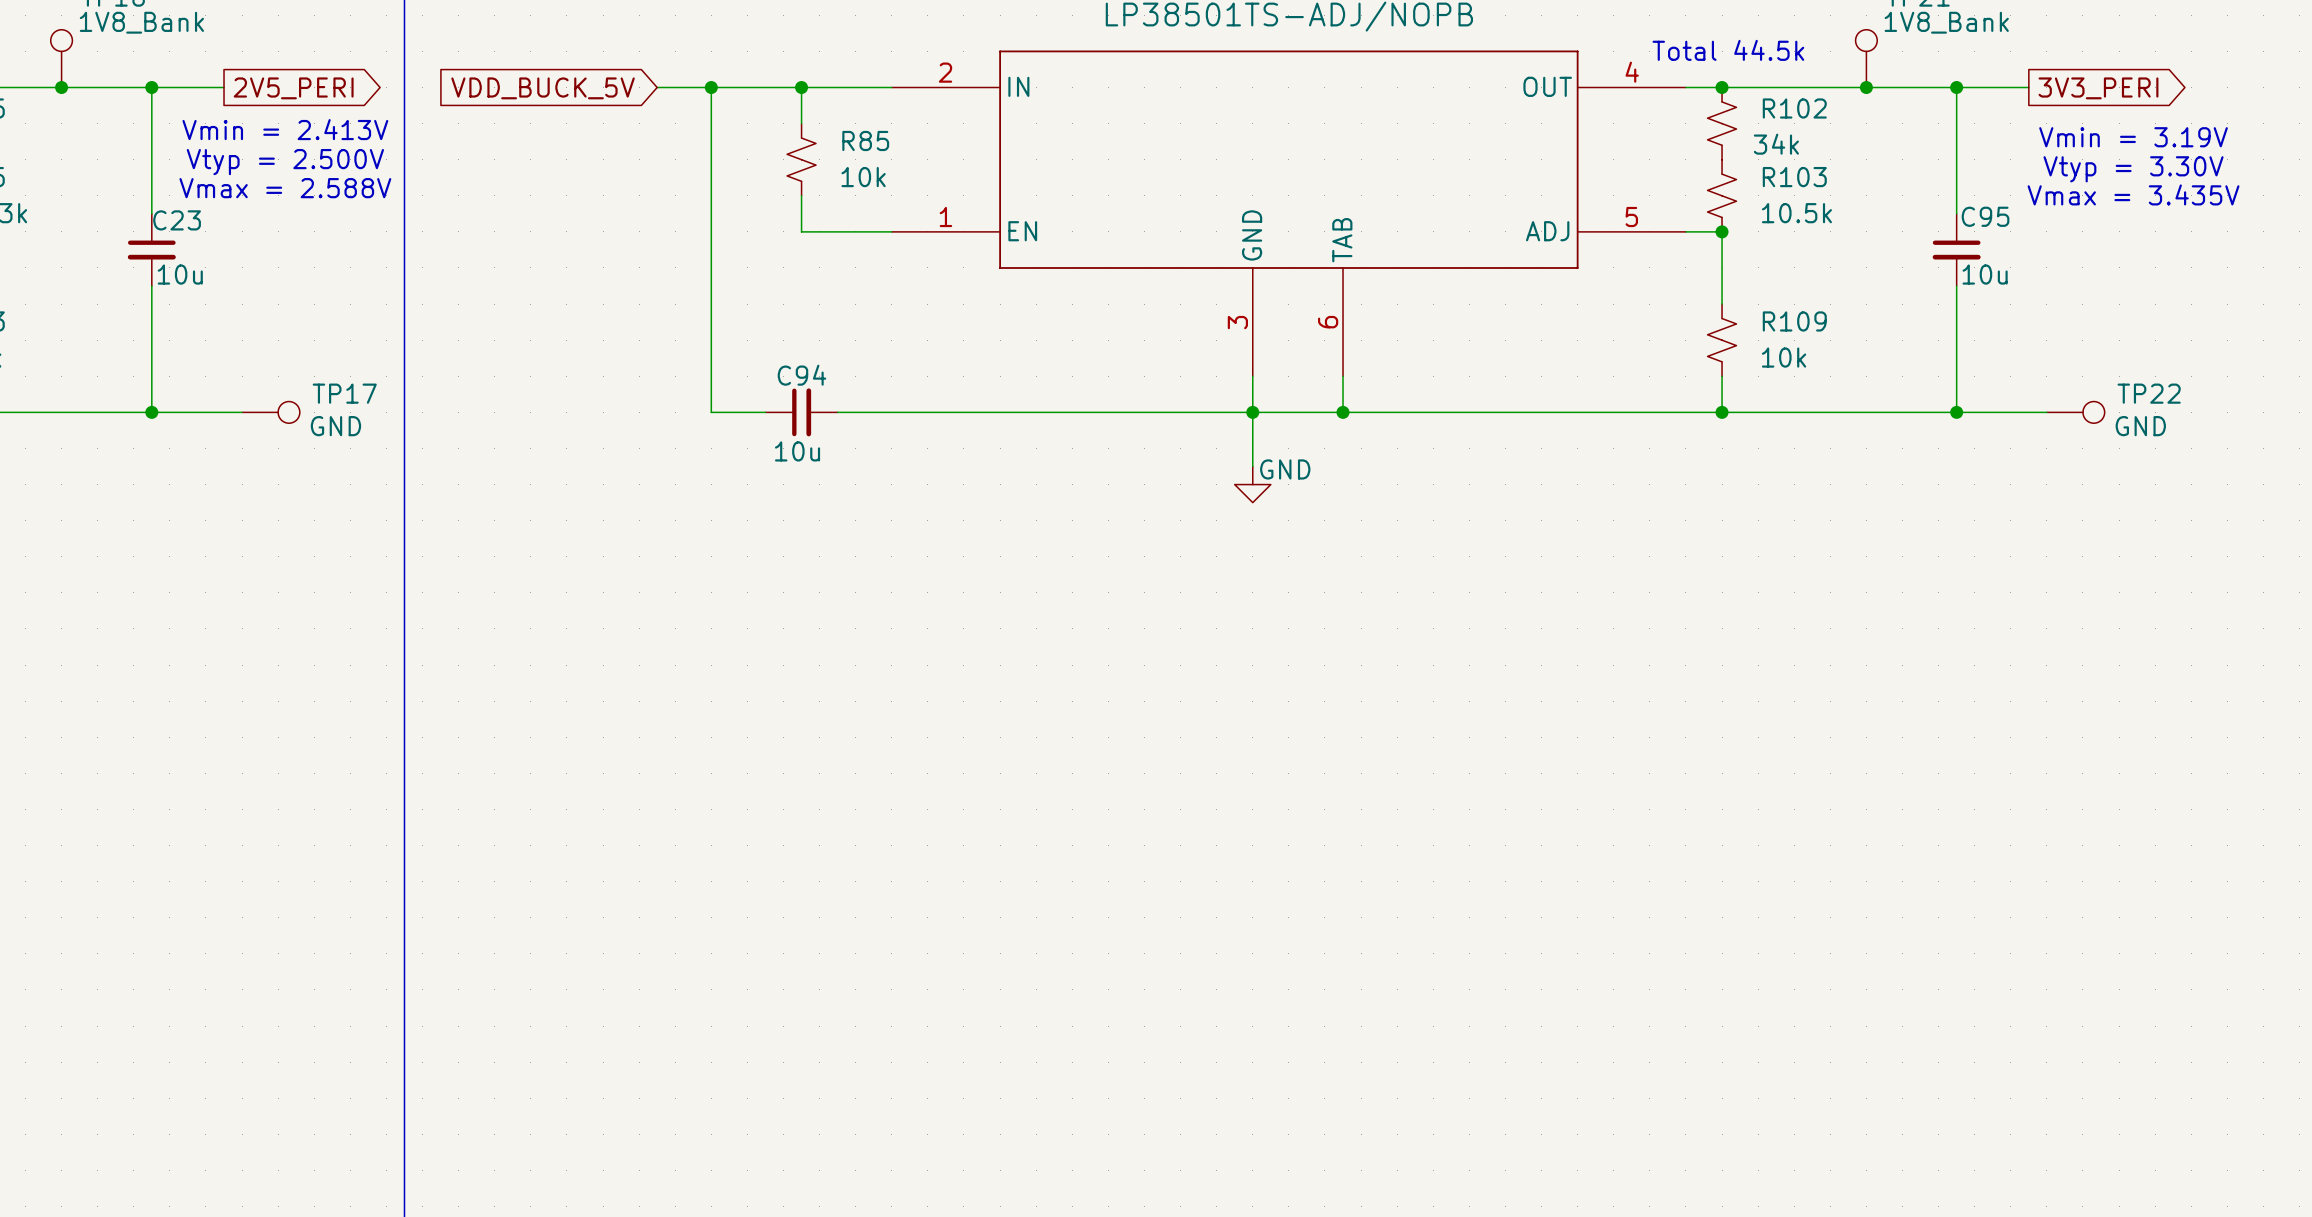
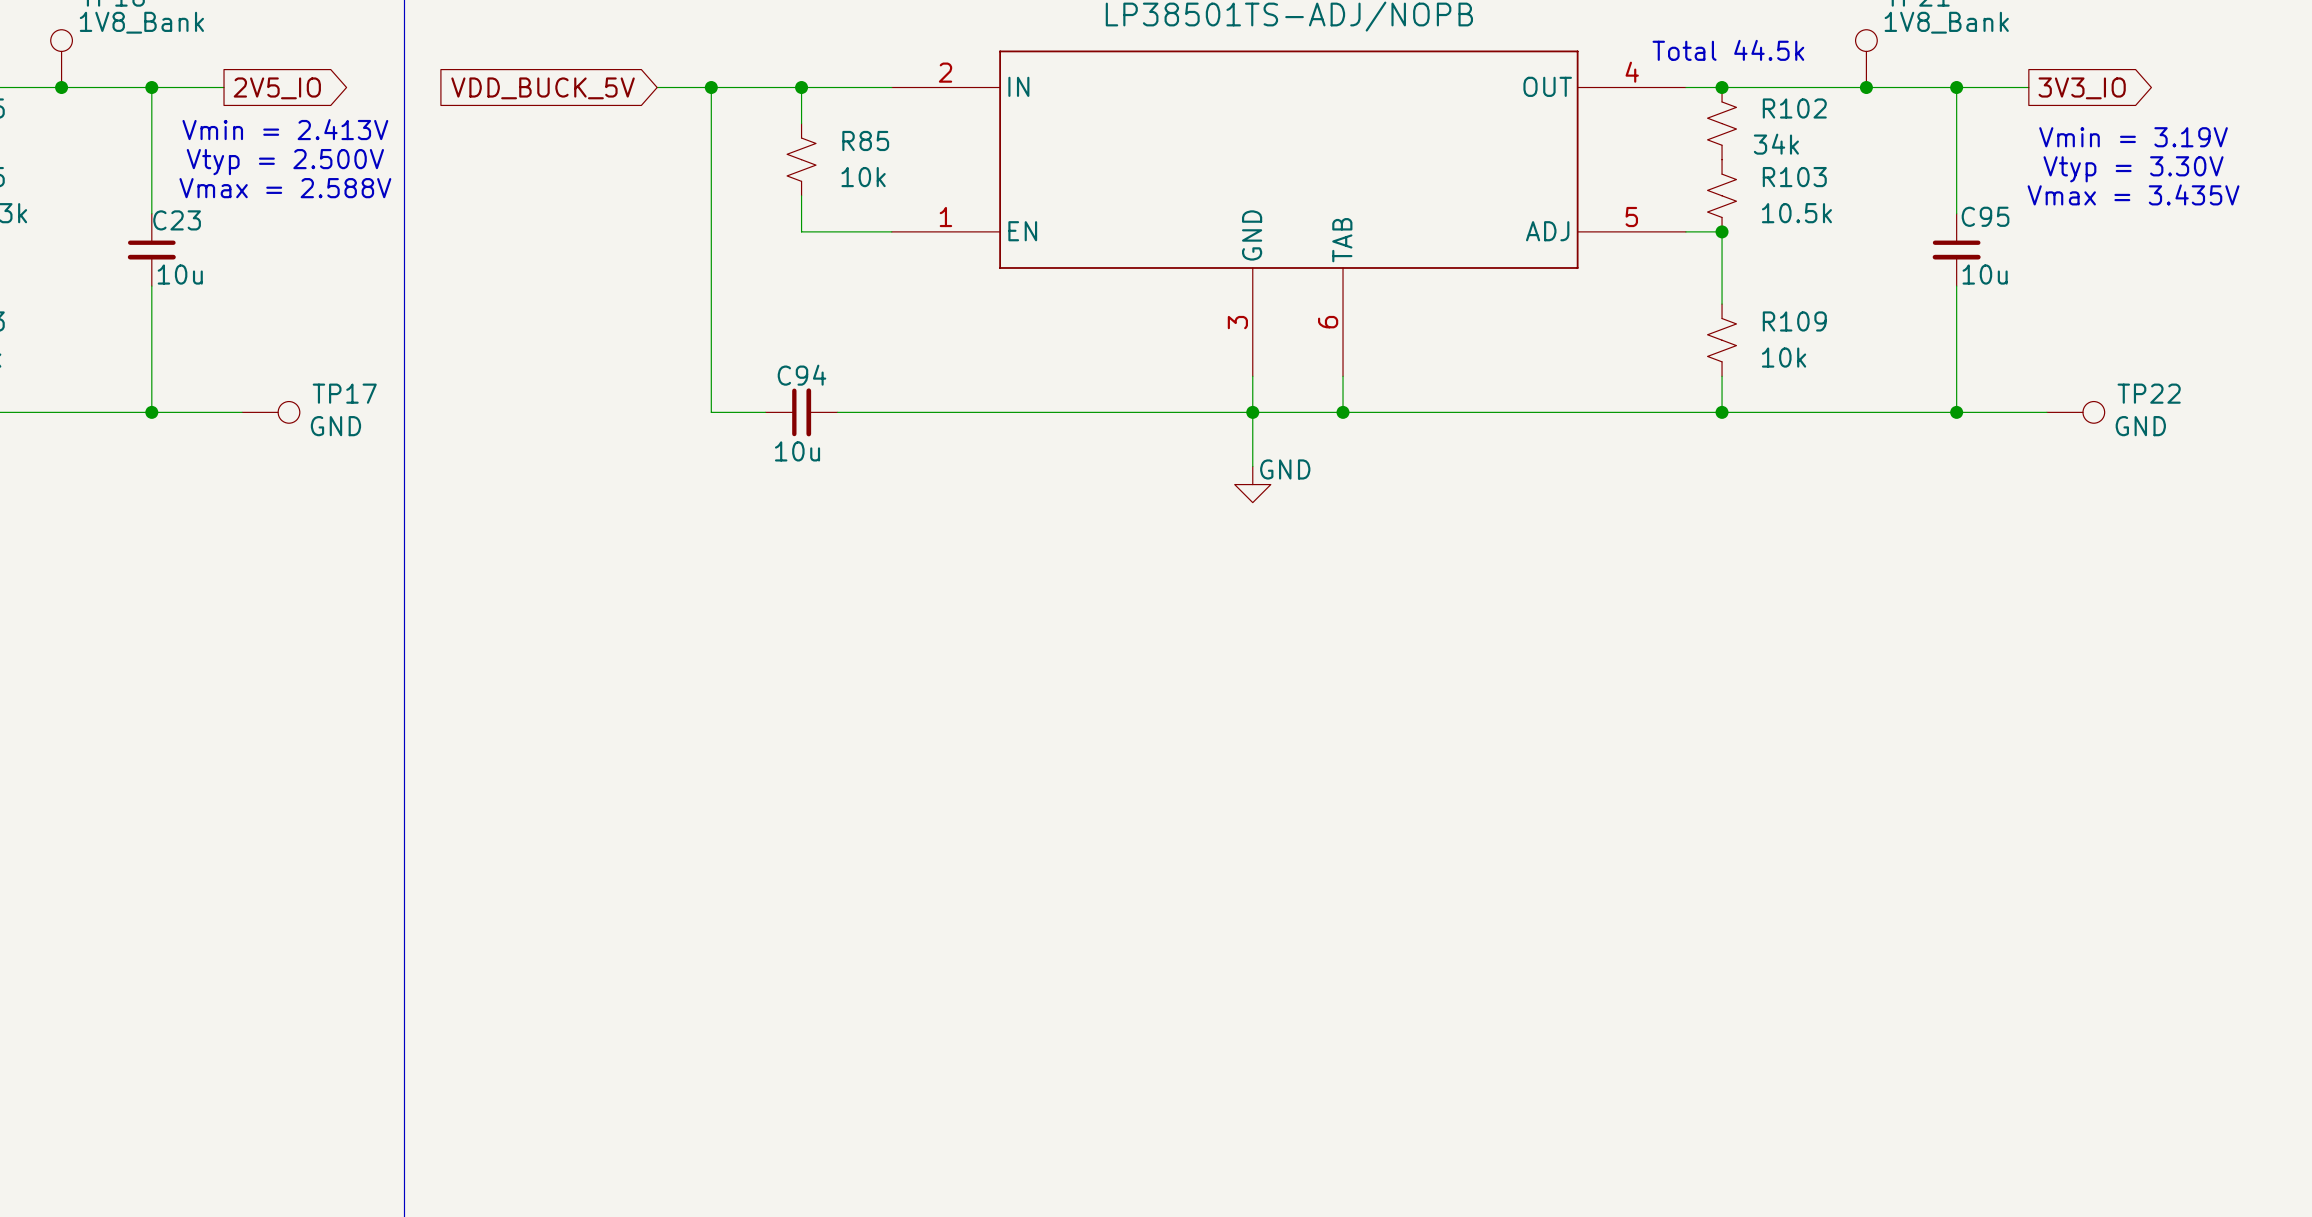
global label: 2V5_PERI (293, 88) -> 2V5_IO (277, 88)
global label: 3V3_PERI (2098, 88) -> 3V3_IO (2082, 88)

